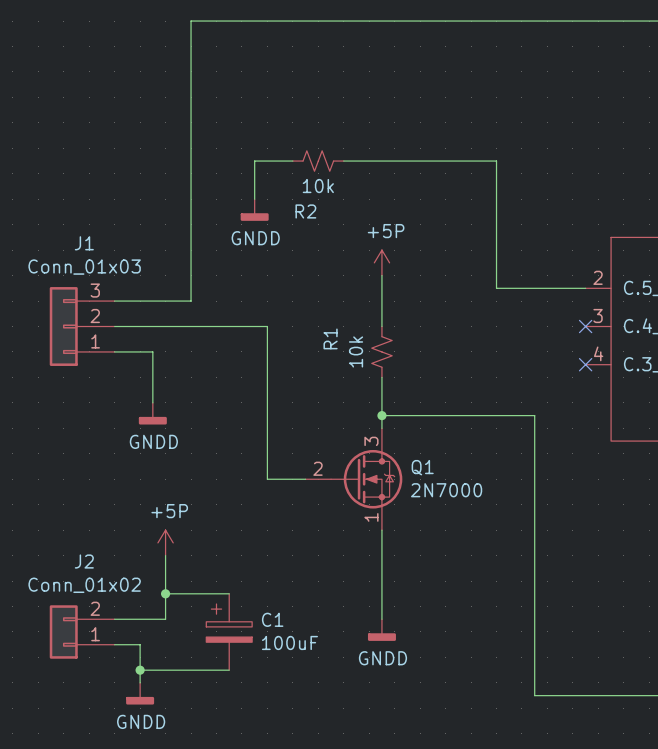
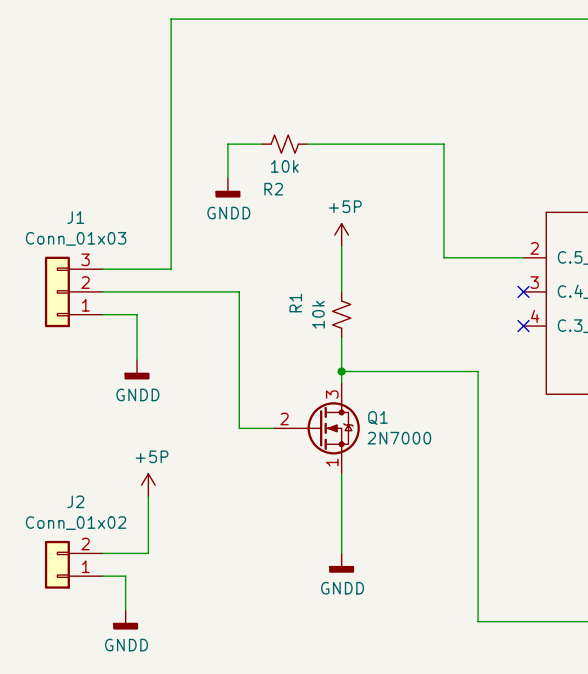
wire: (165, 593) (229, 593) -> none
junction: (165, 593) -> none
C1: 100uF (229, 631) -> none
wire: (140, 670) (229, 670) -> none
junction: (140, 670) -> none

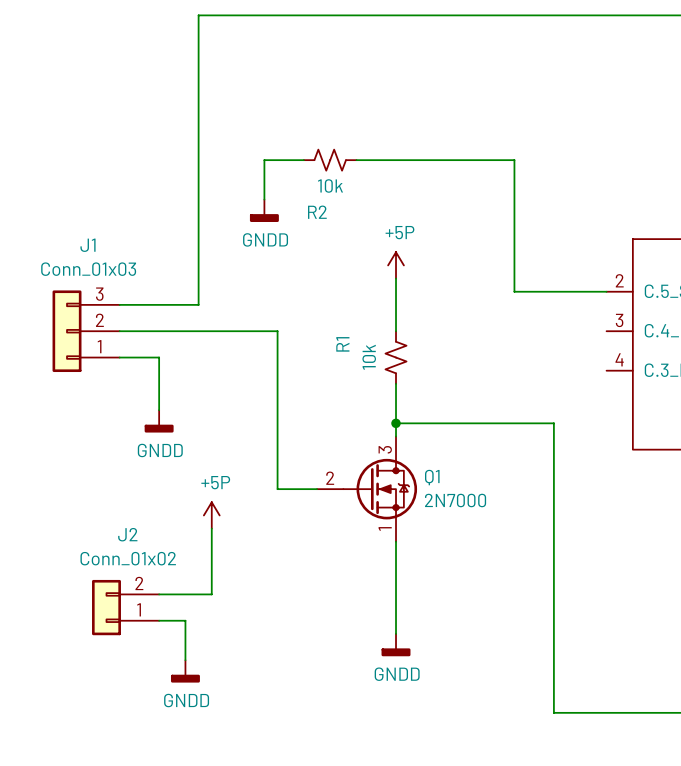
no-connect mark: (523, 291) -> none
no-connect mark: (523, 326) -> none
power symbol position: +5P (148, 485) -> +5P (211, 515)
wire: (148, 496) (148, 553) (102, 553) -> (211, 528) (211, 594) (159, 594)
J2 position: (73, 564) -> (125, 607)
wire: (102, 576) (125, 576) (125, 610) -> (159, 620) (185, 620) (185, 660)
power symbol position: GNDD (125, 619) -> GNDD (185, 671)

